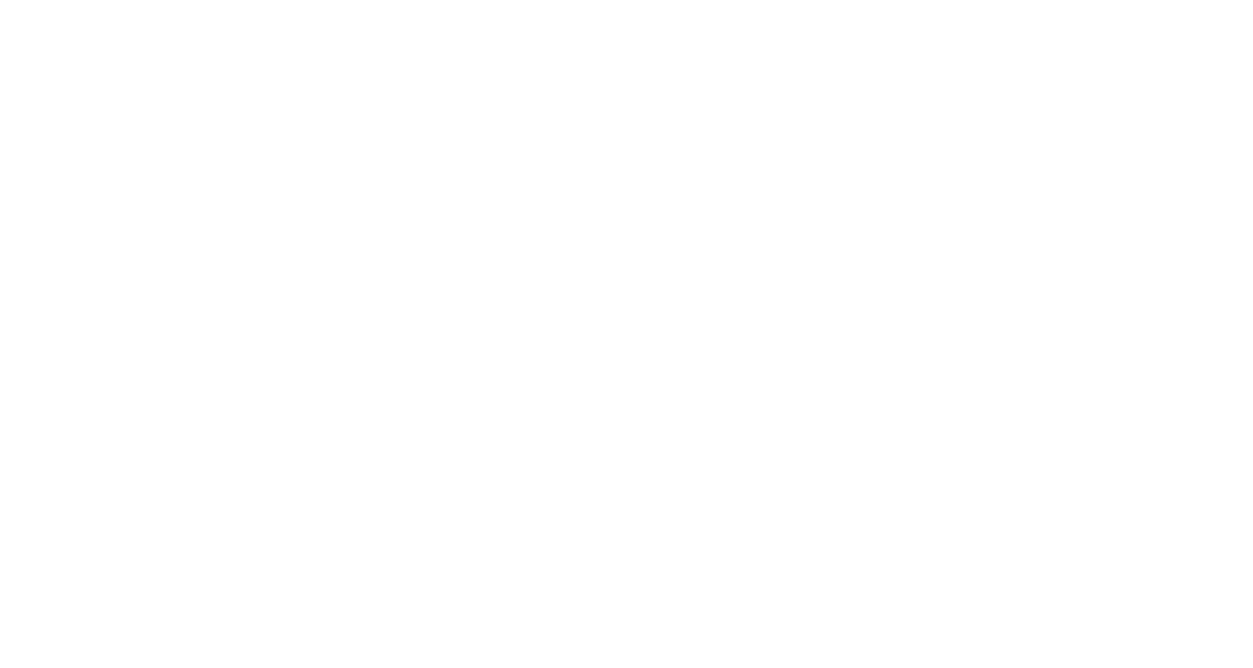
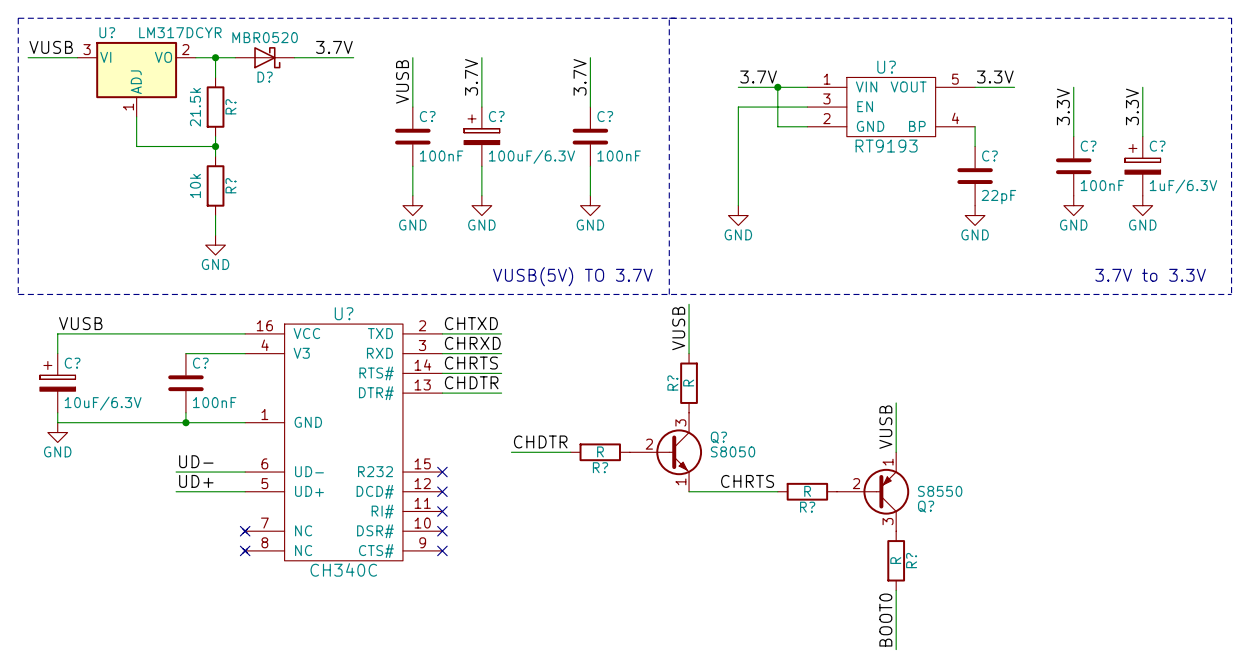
line: none -> (18, 18) (18, 294) (1231, 294) (1231, 18) (18, 18)
line: none -> (669, 18) (669, 294)
label: none -> VUSB (51, 47)
label: none -> 3.7V (334, 47)
wire: none -> (28, 57) (77, 57)
wire: none -> (195, 57) (235, 57)
wire: none -> (215, 57) (215, 77)
junction: none -> (215, 57)
D?: none -> MBR0520 (264, 57)
wire: none -> (294, 57) (353, 57)
wire: none -> (412, 57) (412, 107)
wire: none -> (481, 57) (481, 107)
wire: none -> (590, 57) (590, 107)
label: none -> 3.7V (758, 76)
label: none -> 3.3V (995, 76)
label: none -> 3.7V (471, 77)
label: none -> 3.7V (580, 77)
U?: none -> LM317DCYR (136, 79)
label: none -> VUSB (402, 81)
wire: none -> (738, 87) (807, 87)
wire: none -> (777, 87) (777, 126) (807, 126)
junction: none -> (777, 87)
wire: none -> (975, 87) (1014, 87)
wire: none -> (1073, 87) (1073, 136)
wire: none -> (1142, 87) (1142, 136)
label: none -> 3.3V (1063, 106)
label: none -> 3.3V (1132, 106)
R?: none -> 21.5k (215, 107)
wire: none -> (807, 107) (738, 107) (738, 205)
U?: none -> RT9193 (891, 107)
wire: none -> (136, 116) (136, 146) (215, 146)
wire: none -> (975, 126) (975, 146)
wire: none -> (215, 136) (215, 156)
C?: none -> 100nF (412, 136)
C?: none -> 100uF/6.3V (481, 136)
C?: none -> 100nF (590, 136)
junction: none -> (215, 146)
wire: none -> (412, 166) (412, 195)
wire: none -> (481, 166) (481, 195)
wire: none -> (590, 166) (590, 195)
C?: none -> 100nF (1073, 166)
C?: none -> 1uF/6.3V (1142, 166)
C?: none -> 22pF (975, 176)
R?: none -> 10k (215, 185)
power symbol: none -> GND (412, 205)
power symbol: none -> GND (481, 205)
power symbol: none -> GND (590, 205)
power symbol: none -> GND (1073, 205)
power symbol: none -> GND (1142, 205)
wire: none -> (215, 215) (215, 235)
power symbol: none -> GND (738, 215)
power symbol: none -> GND (975, 215)
power symbol: none -> GND (215, 245)
text: none -> 3.7V to 3.3V (1150, 275)
text: none -> VUSB(5V) TO 3.7V (572, 276)
wire: none -> (689, 304) (689, 353)
label: none -> VUSB (80, 323)
label: none -> CHTXD (471, 323)
label: none -> VUSB (678, 328)
wire: none -> (245, 333) (57, 333) (57, 353)
wire: none -> (442, 333) (501, 333)
label: none -> CHRXD (472, 343)
wire: none -> (185, 353) (245, 353)
wire: none -> (442, 353) (501, 353)
label: none -> CHRTS (471, 363)
wire: none -> (442, 373) (501, 373)
label: none -> CHDTR (471, 382)
C?: none -> 10uF/6.3V (57, 383)
C?: none -> 100nF (185, 383)
R?: none -> R (689, 383)
wire: none -> (442, 393) (501, 393)
wire: none -> (896, 402) (896, 452)
wire: none -> (57, 412) (57, 422) (245, 422)
wire: none -> (185, 412) (185, 422)
junction: none -> (185, 422)
label: none -> VUSB (885, 427)
power symbol: none -> GND (57, 432)
label: none -> CHDTR (540, 441)
U?: none -> CH340C (342, 442)
wire: none -> (511, 452) (570, 452)
R?: none -> R (600, 452)
Q?: none -> S8050 (665, 452)
label: none -> UD- (196, 461)
wire: none -> (176, 472) (245, 472)
no-connect mark: none -> (442, 472)
label: none -> UD+ (196, 481)
label: none -> CHRTS (747, 481)
wire: none -> (176, 491) (245, 491)
no-connect mark: none -> (442, 491)
wire: none -> (689, 491) (777, 491)
R?: none -> R (807, 491)
Q?: none -> S8550 (873, 491)
no-connect mark: none -> (442, 511)
no-connect mark: none -> (245, 531)
no-connect mark: none -> (442, 531)
no-connect mark: none -> (245, 550)
no-connect mark: none -> (442, 550)
R?: none -> R (896, 560)
wire: none -> (896, 590) (896, 649)
label: none -> BOOT0 (885, 620)

